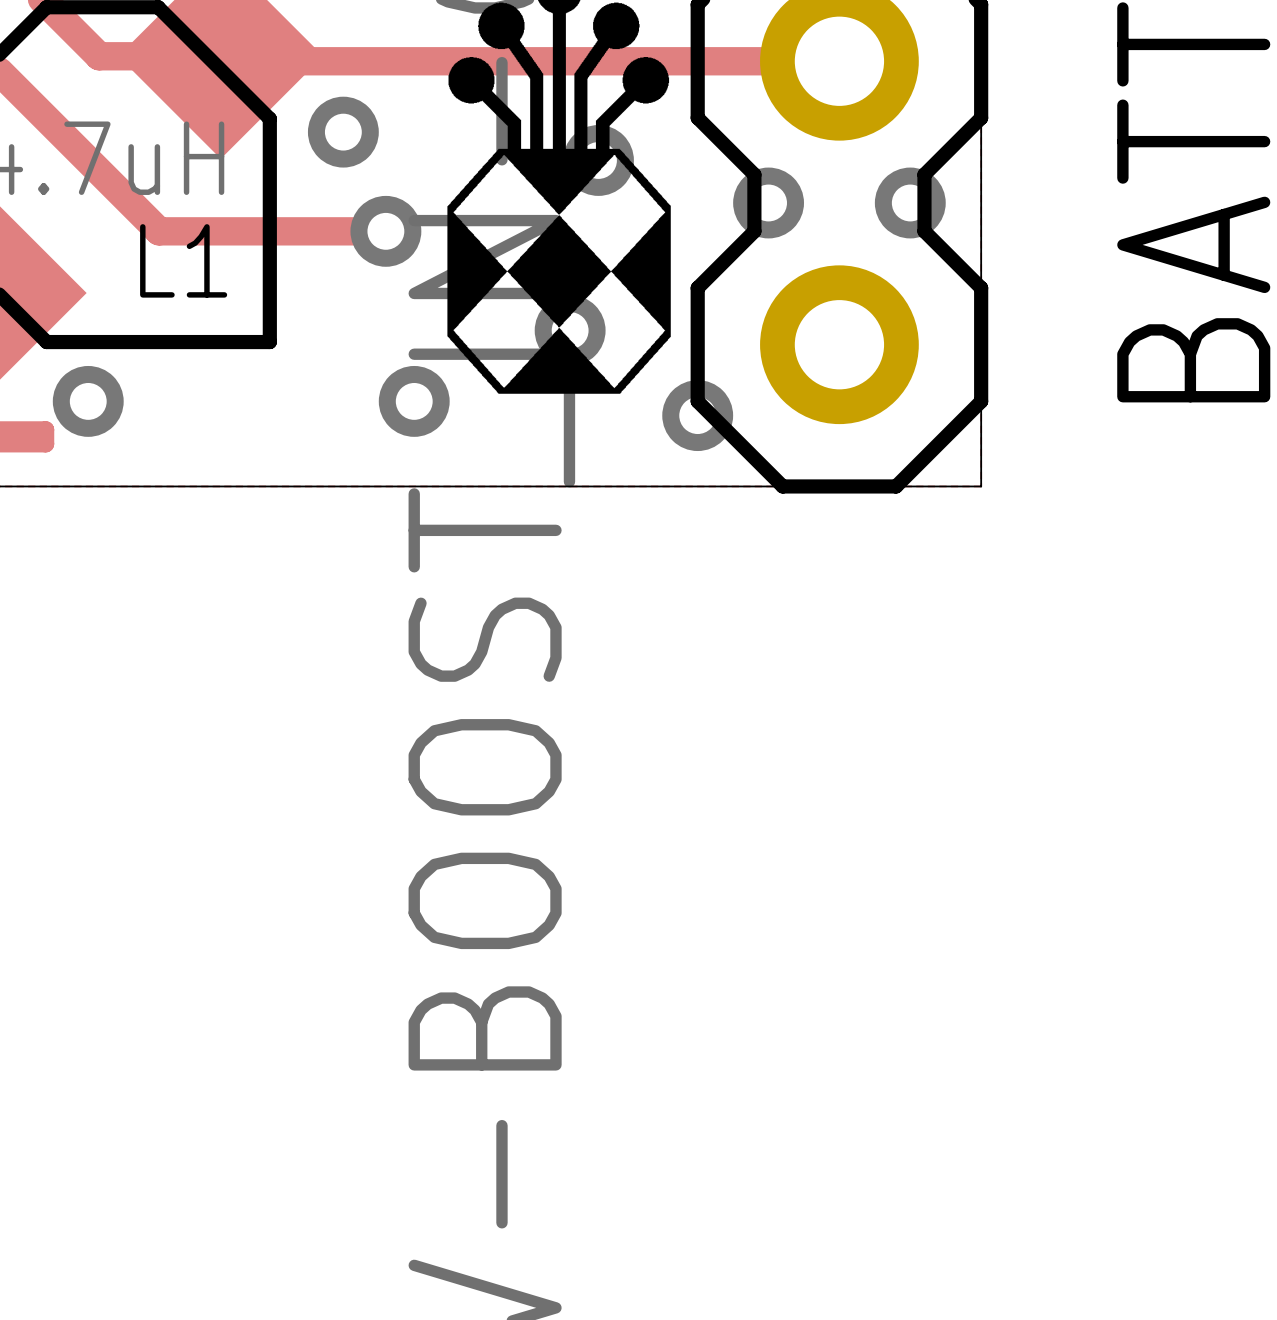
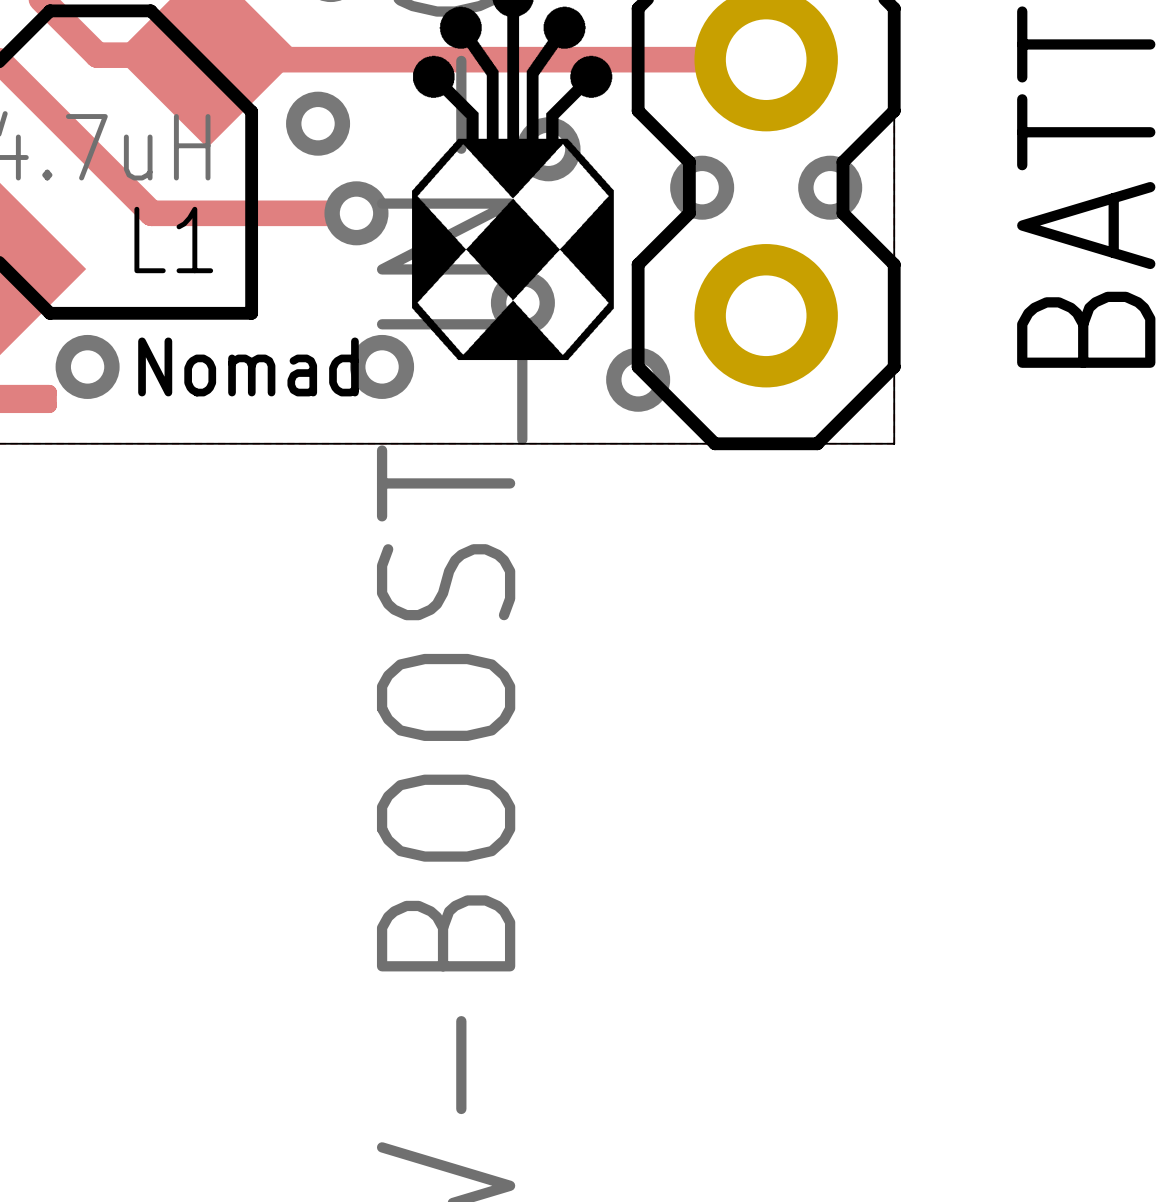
text: none -> Nomad (248, 366)

